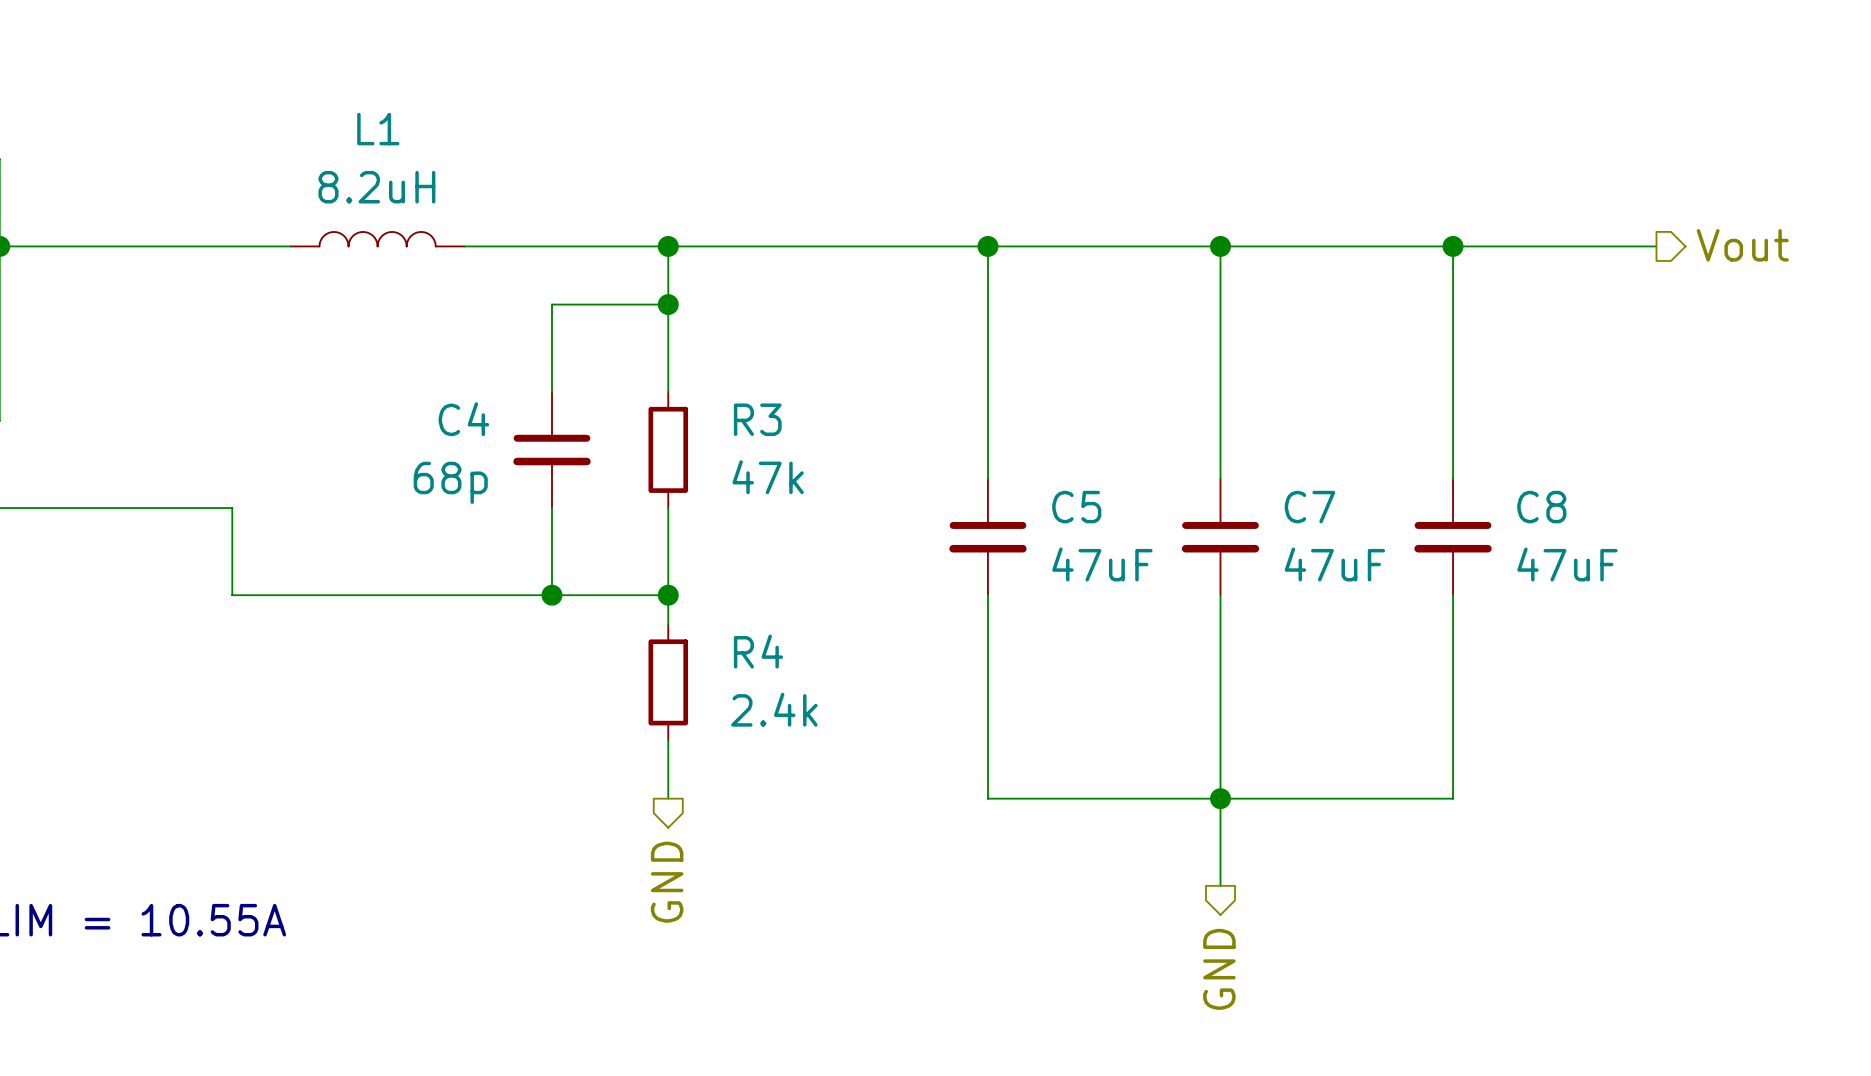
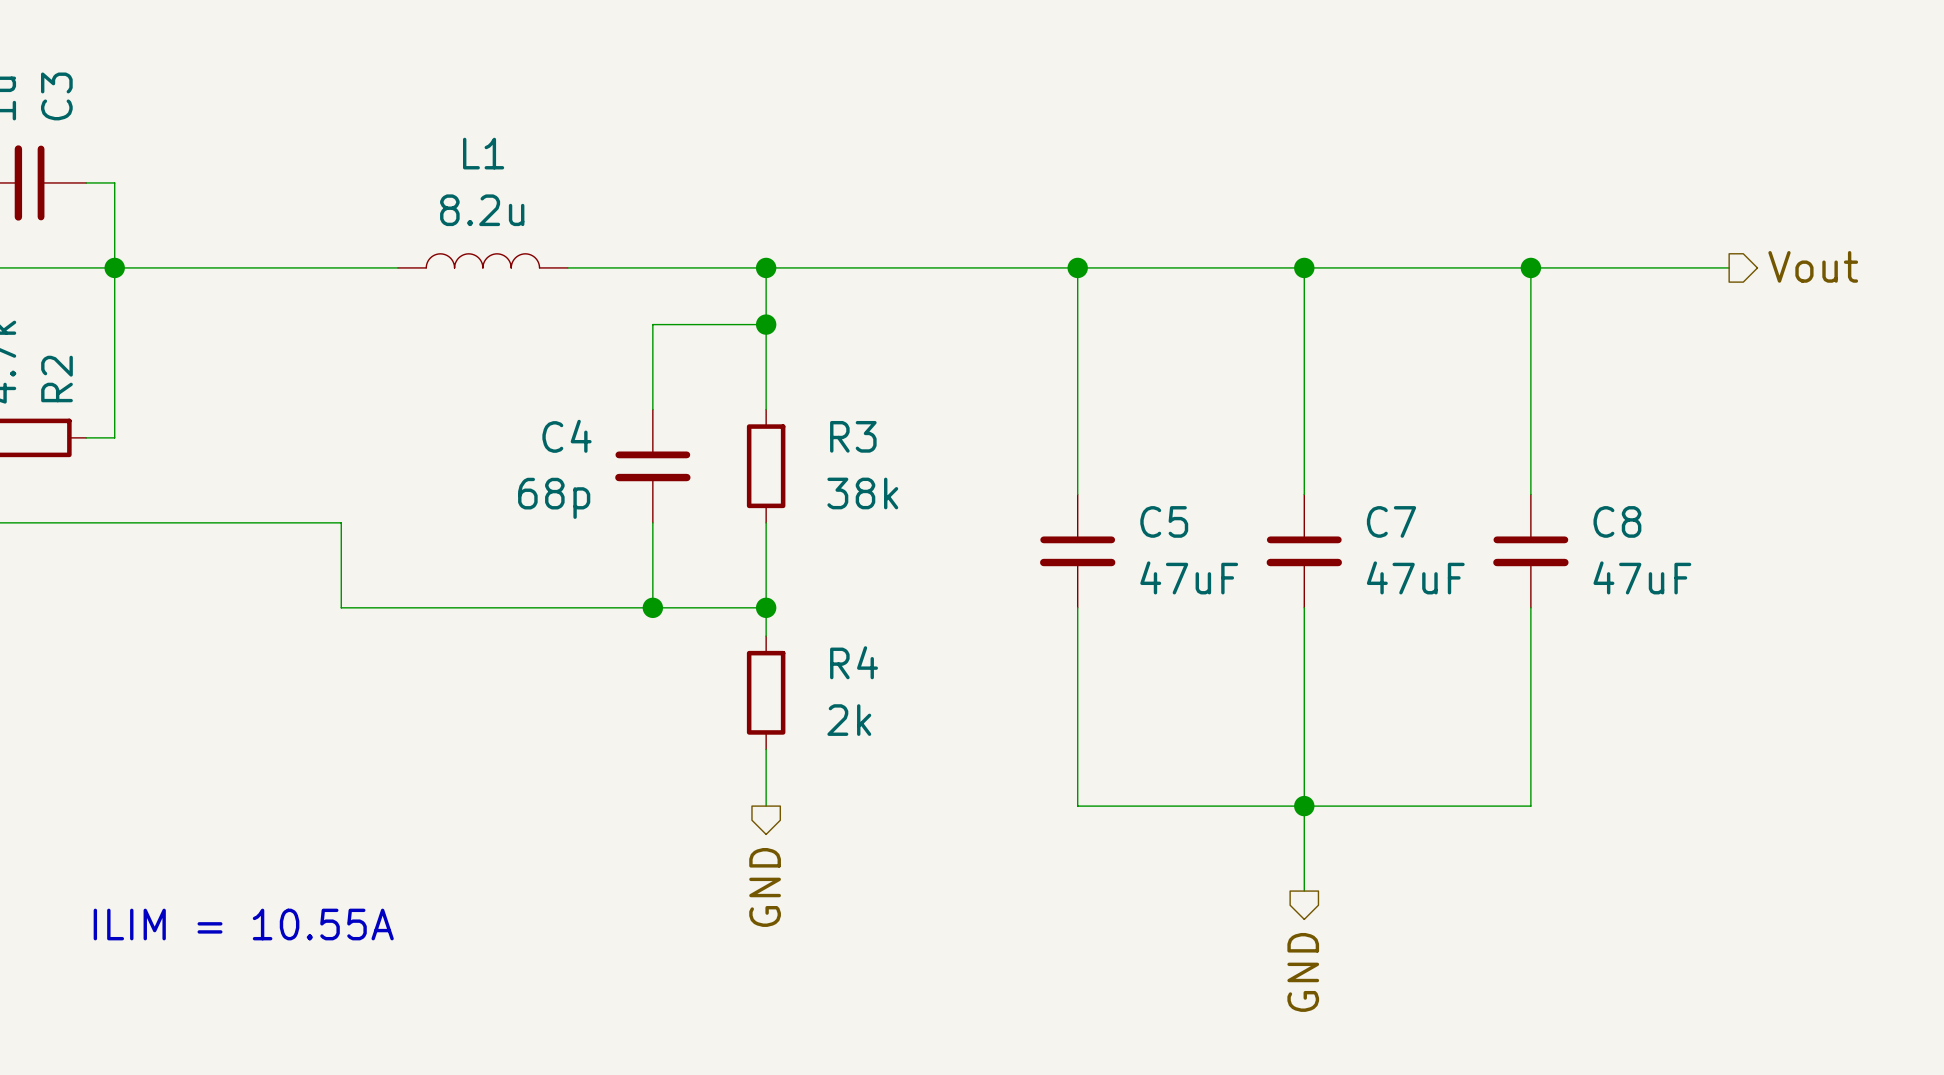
L1 value: 8.2uH (376, 187) -> 8.2u (482, 210)
R3 value: 47k (768, 477) -> 38k (862, 493)
R4 value: 2.4k (774, 709) -> 2k (849, 720)

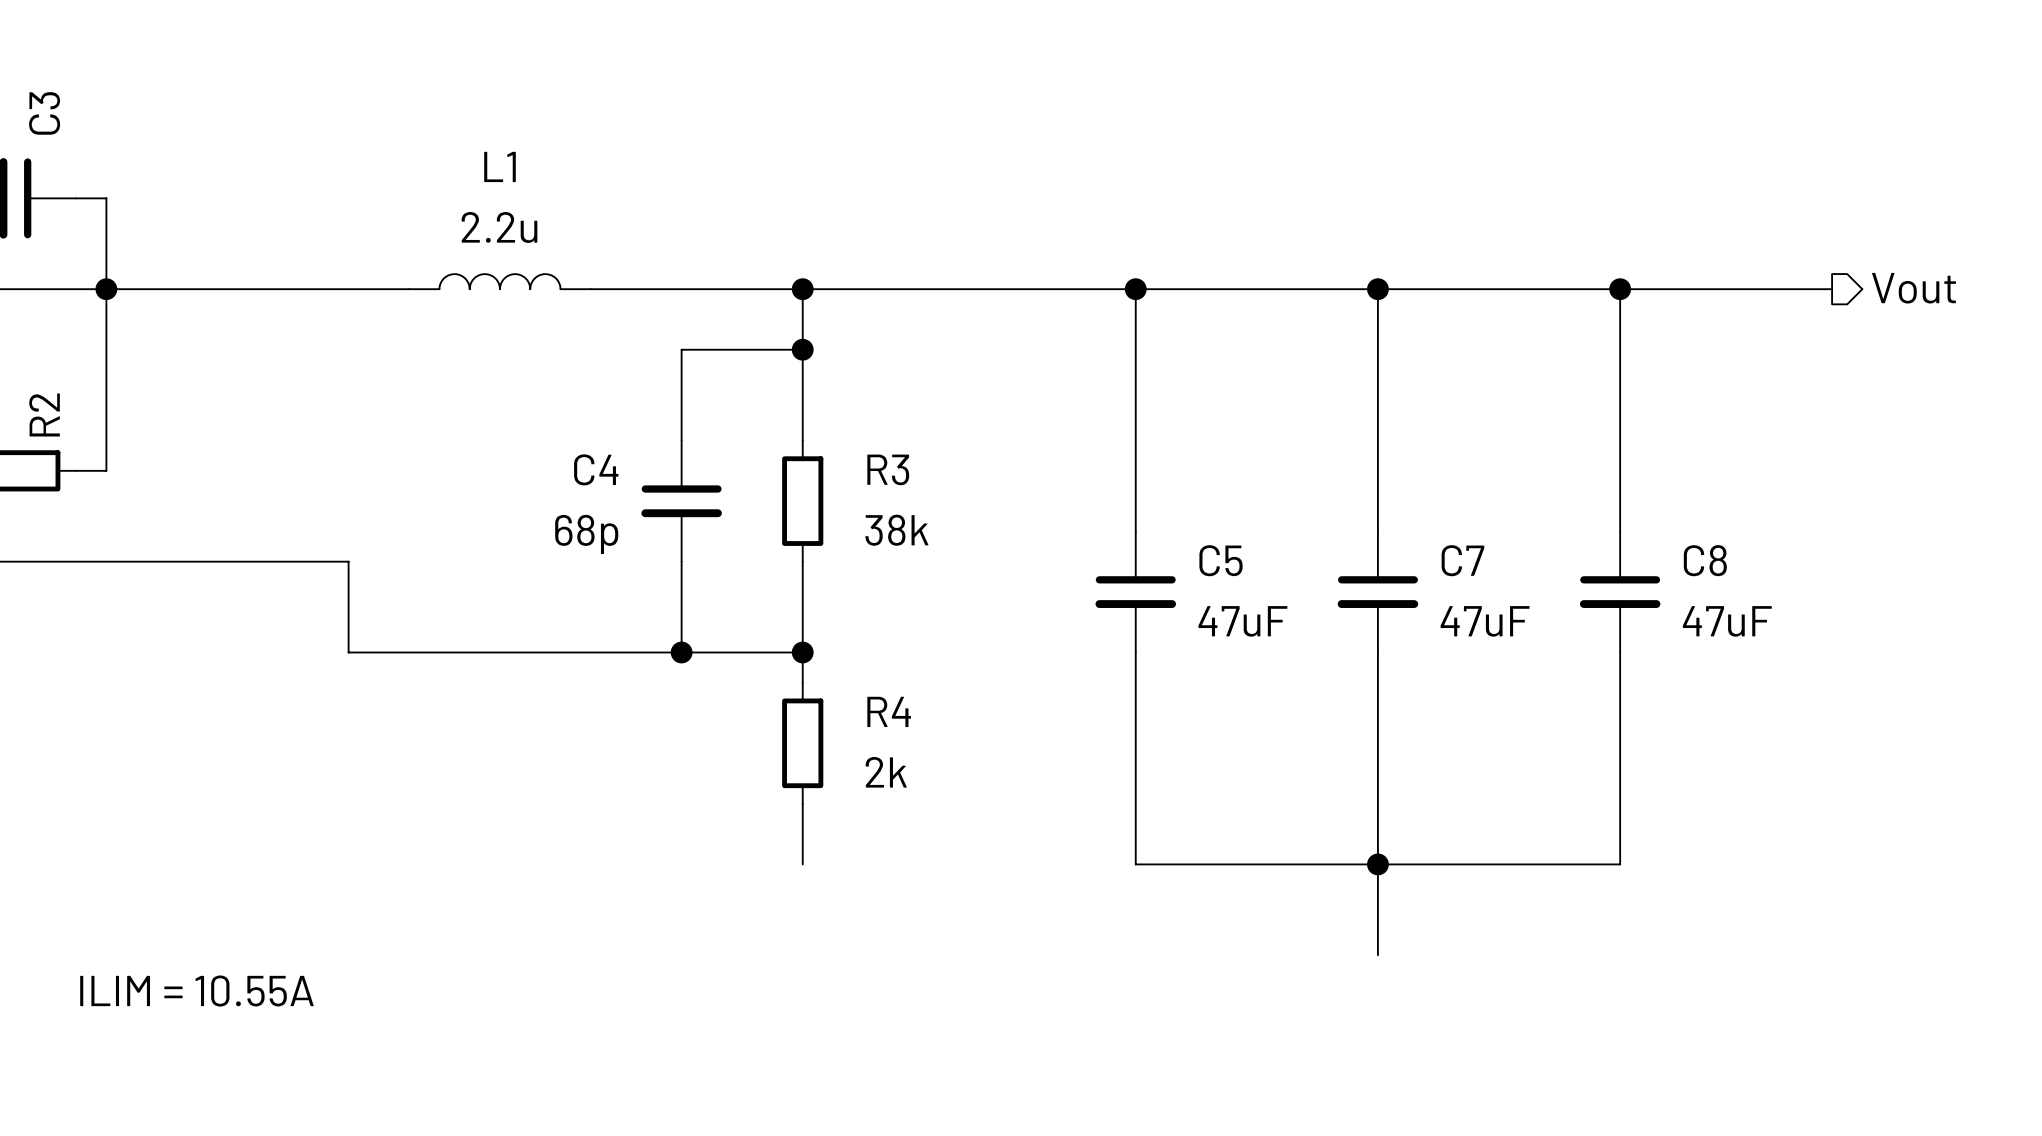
L1 value: 8.2u (482, 210) -> 2.2u (499, 227)
hierarchical label: GND (765, 887) -> none
hierarchical label: GND (1303, 972) -> none

